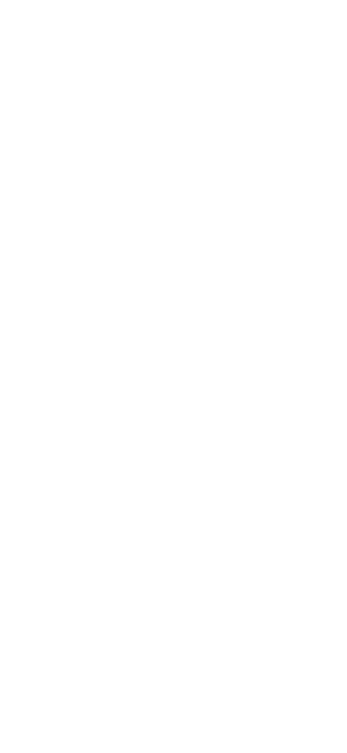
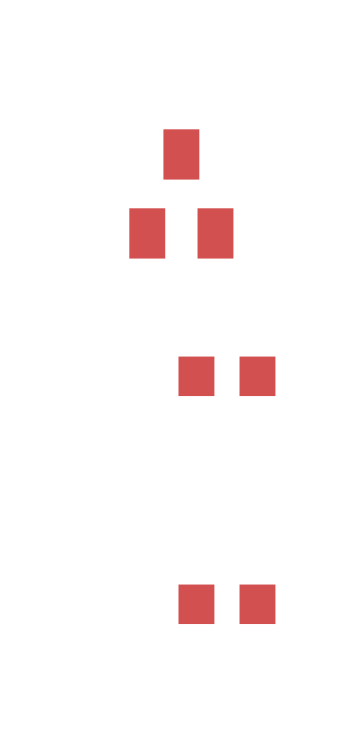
part: none -> (181, 193)
part: none -> (226, 376)
part: none -> (226, 604)

